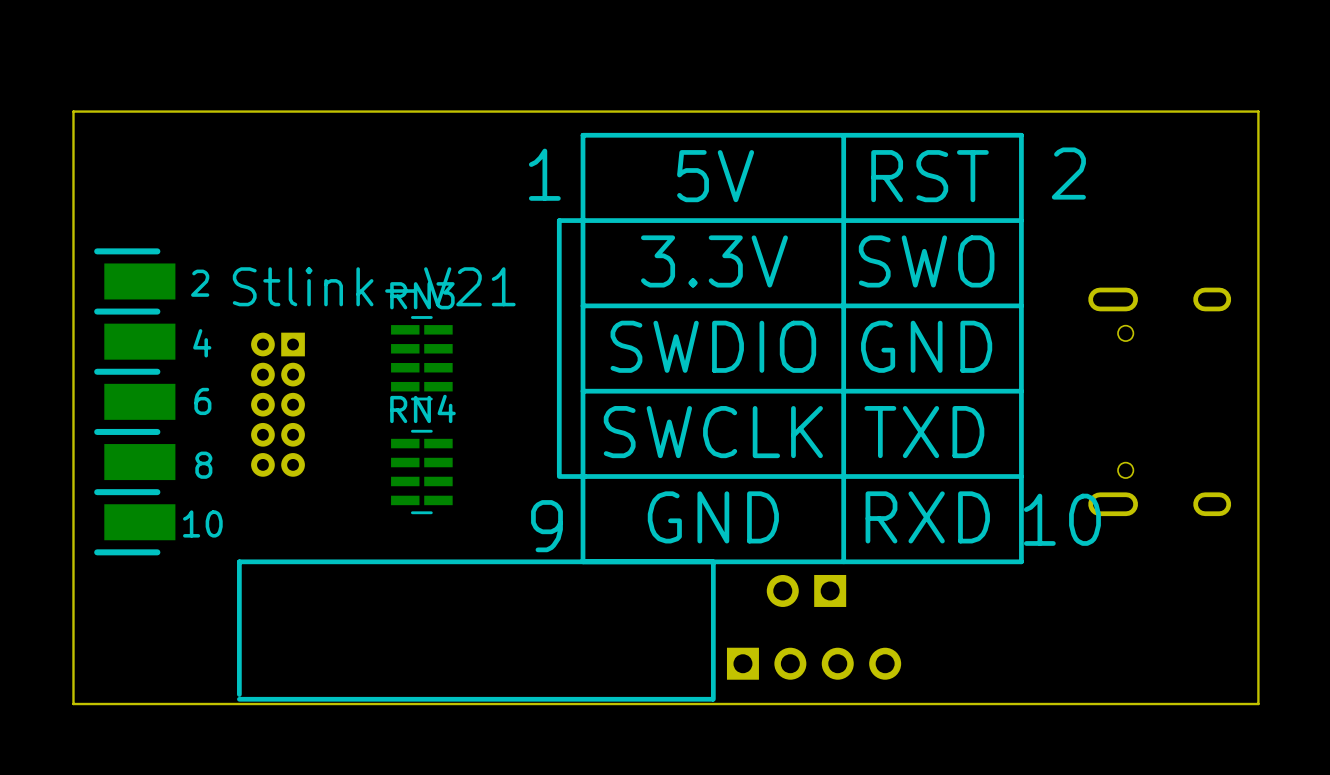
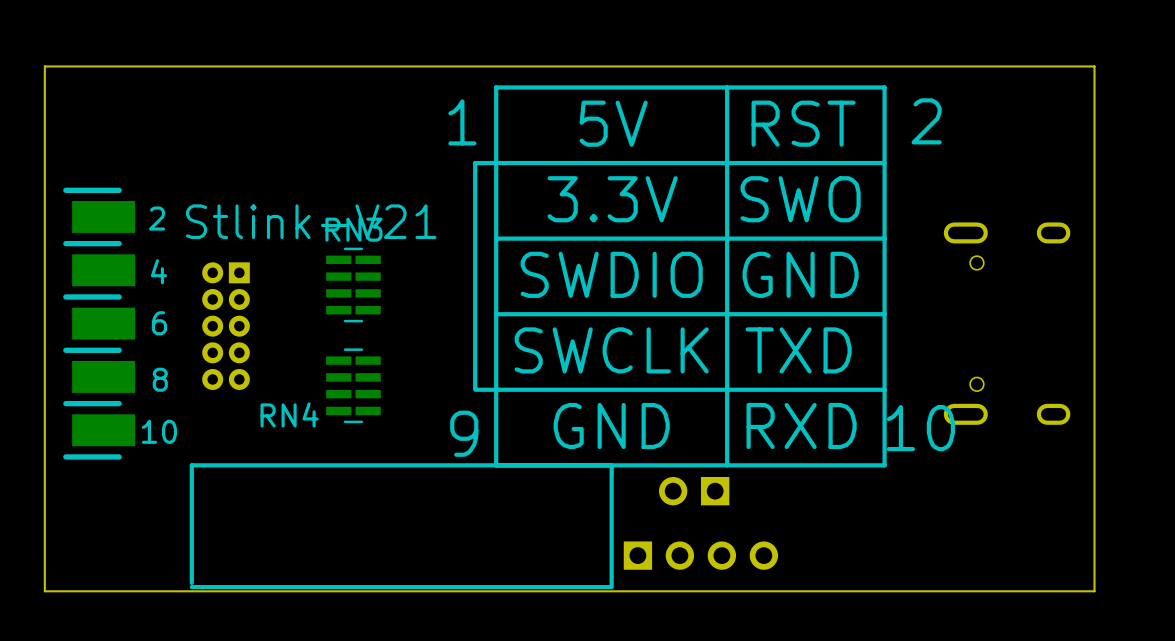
RN4 name position: RN4 (422, 408) -> RN4 (289, 414)

